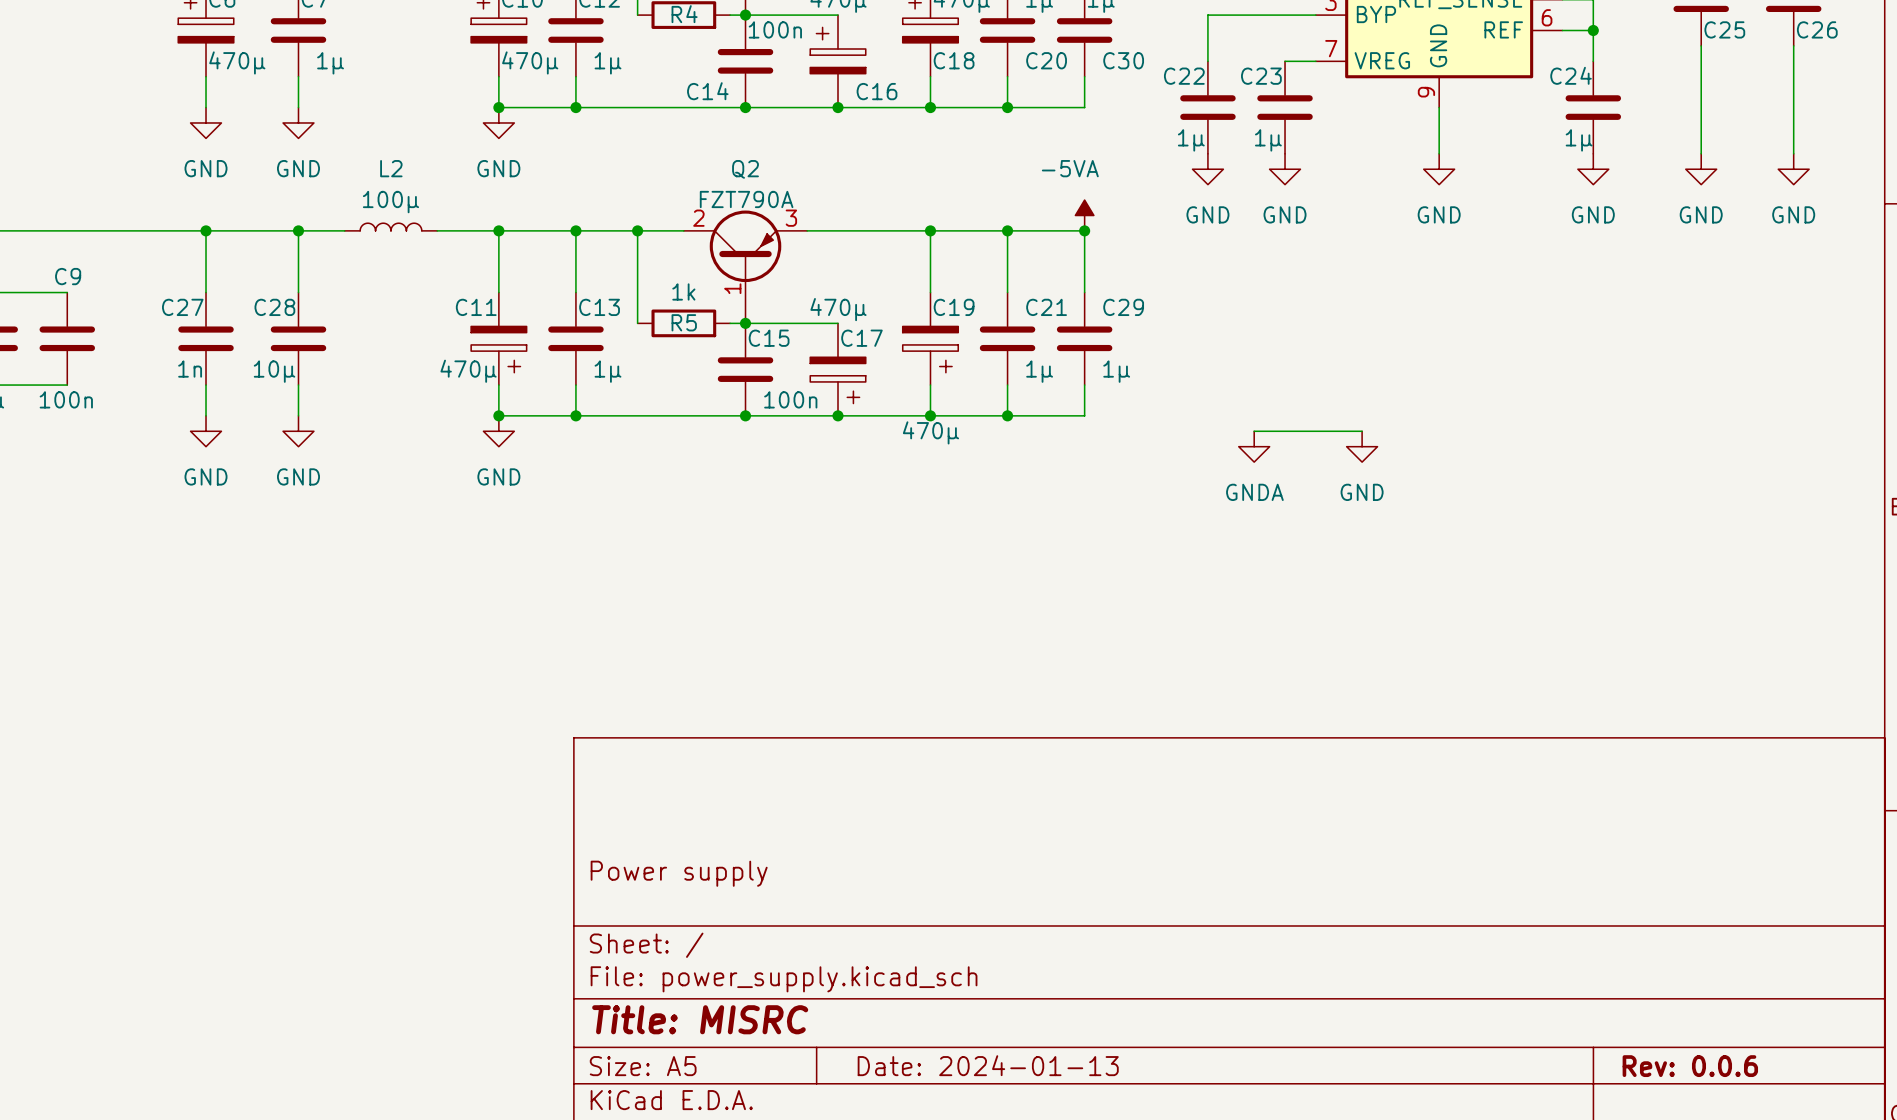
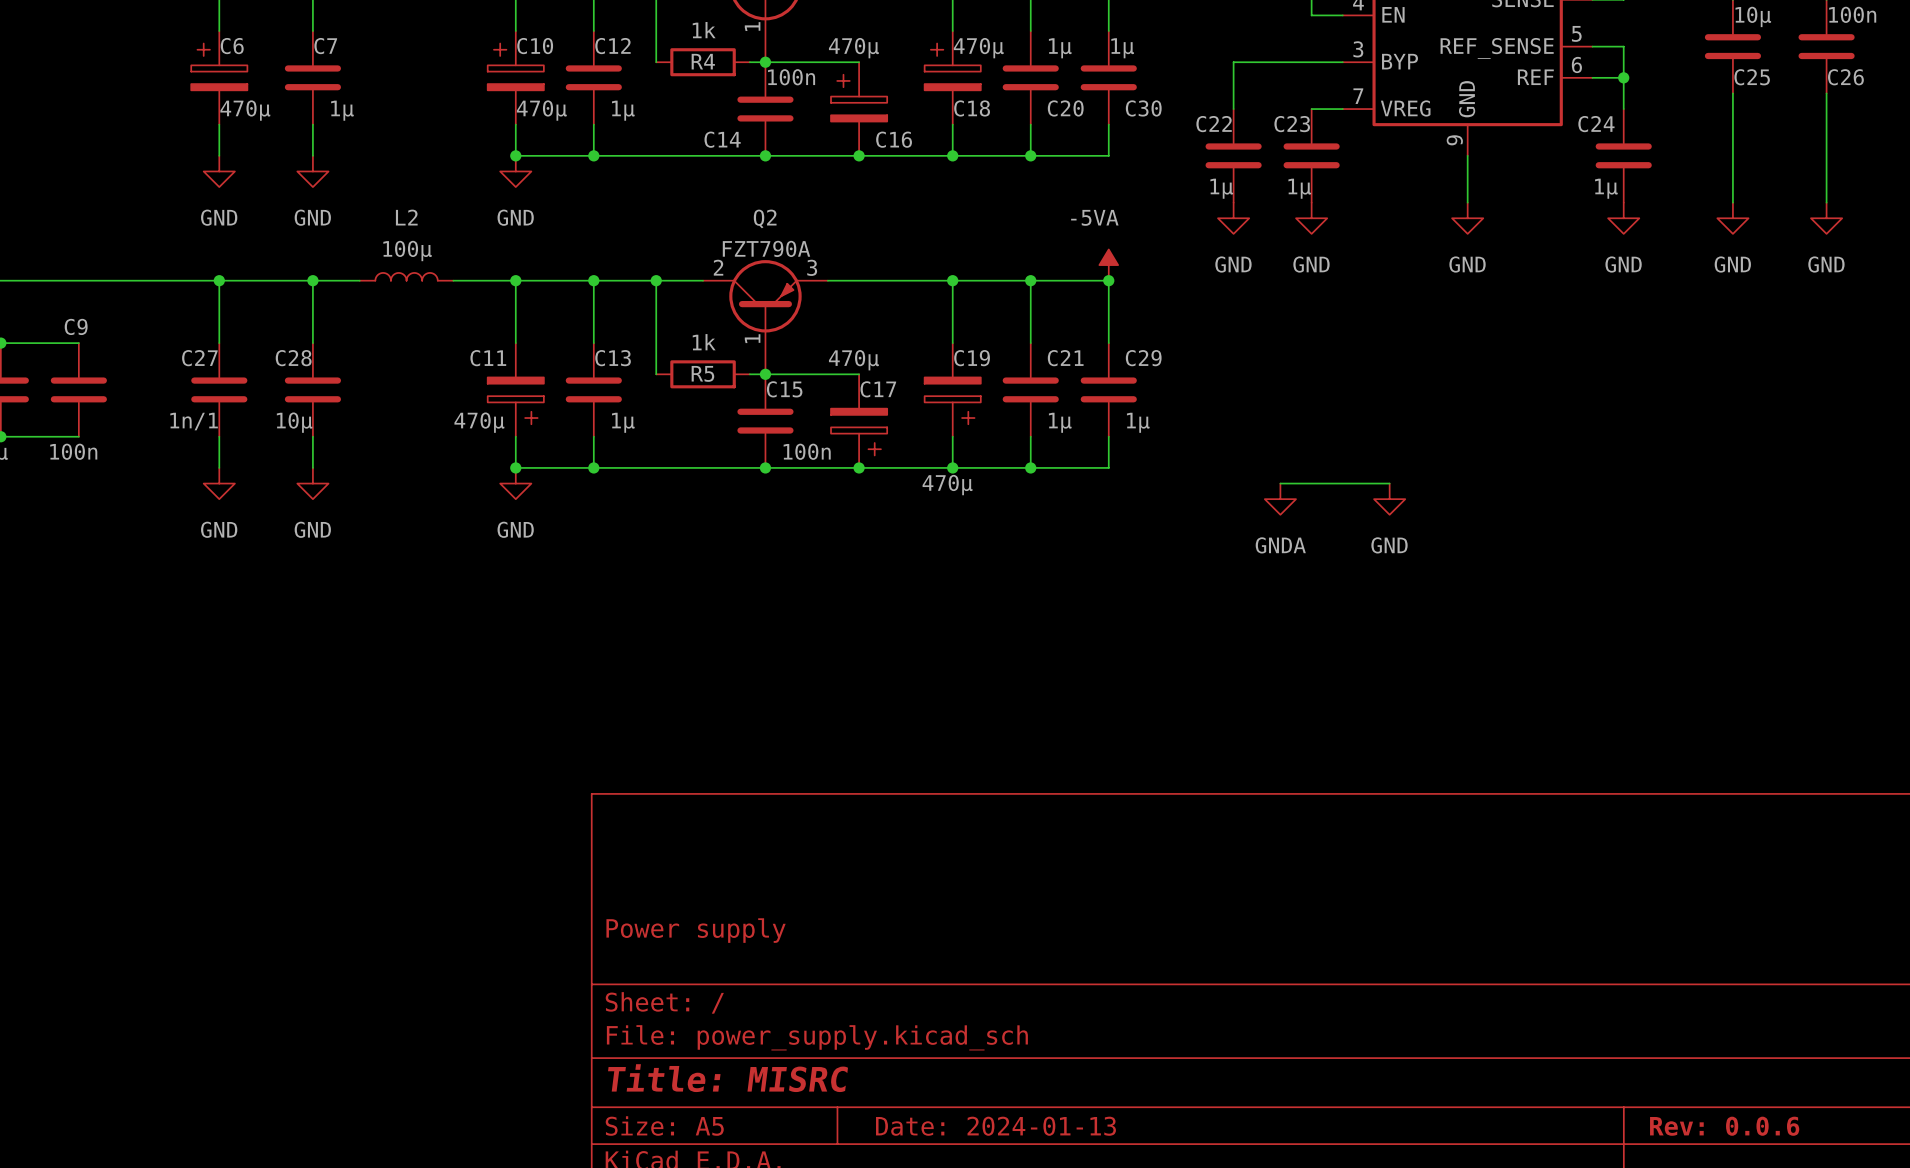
C27 value: 1n (190, 369) -> 1n/1 (194, 421)

